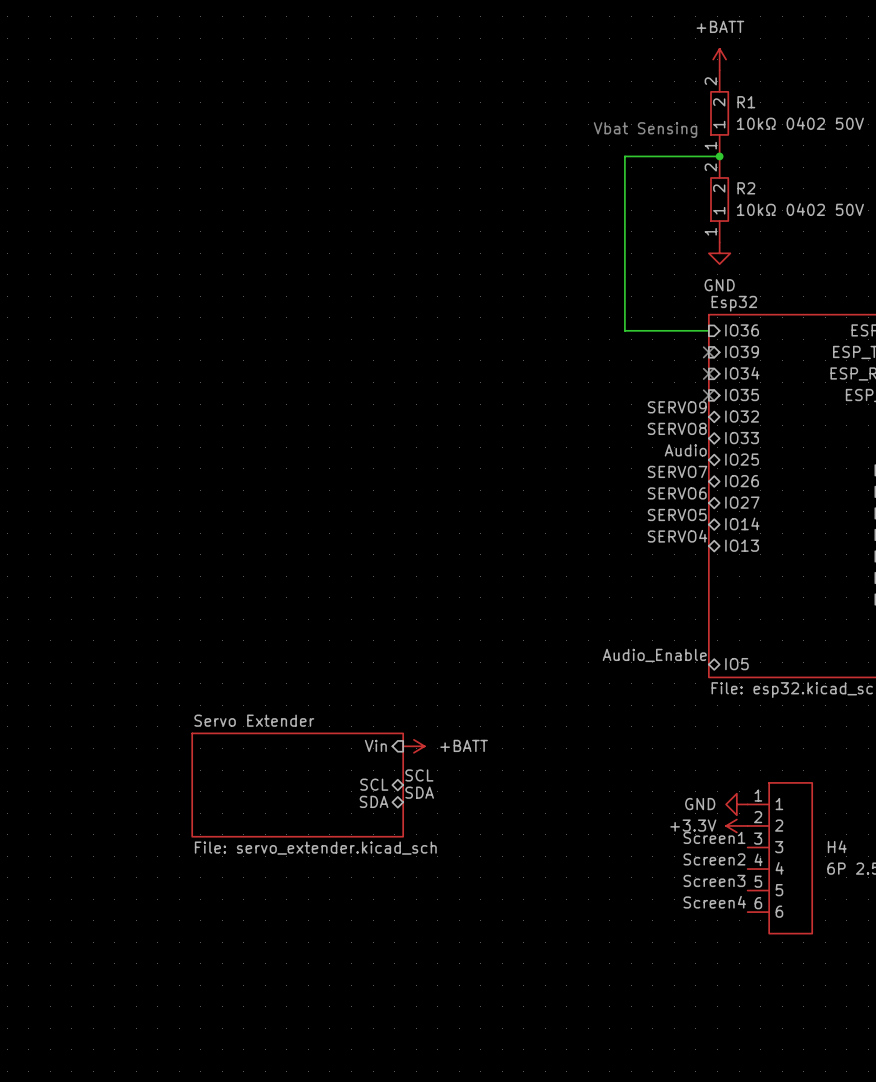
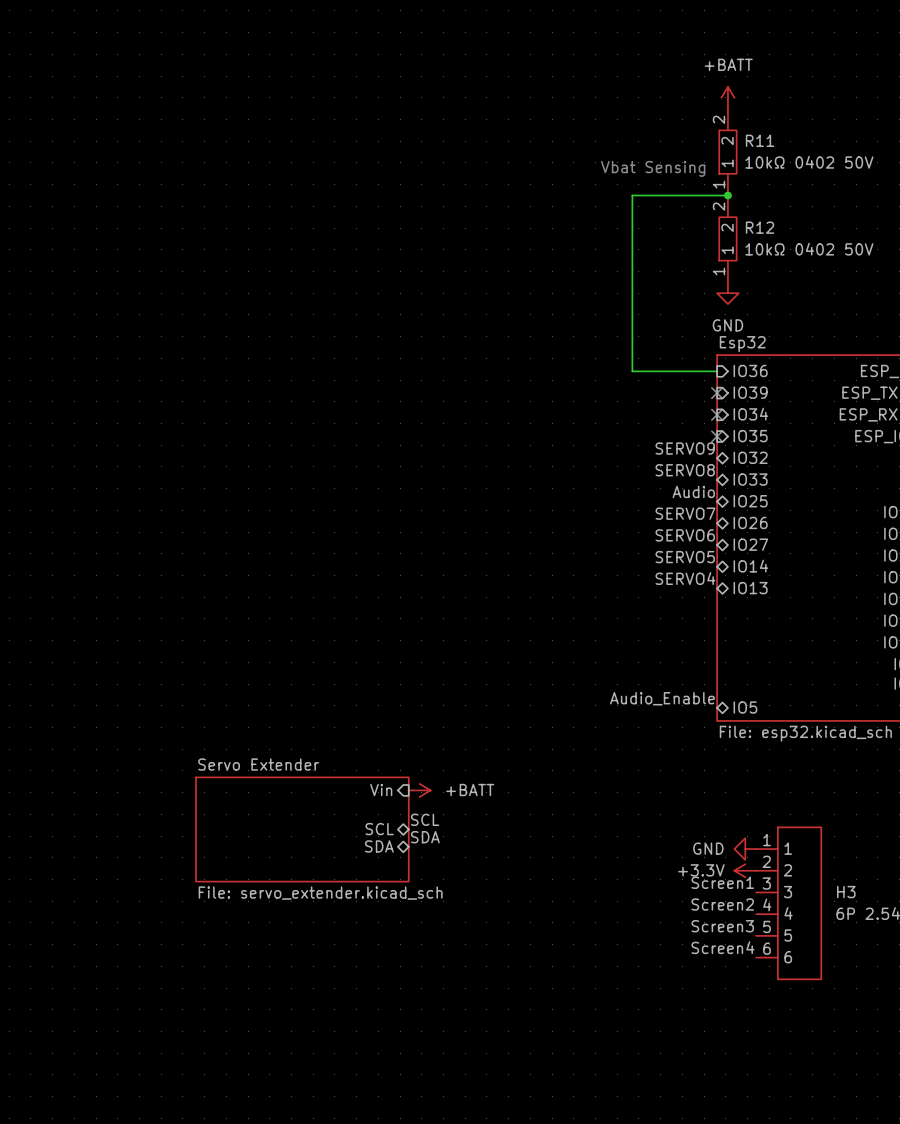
R1 name: R1 (746, 102) -> R11 (760, 140)
R2 name: R2 (746, 188) -> R12 (760, 227)
H4 name: H4 (837, 846) -> H3 (846, 892)

